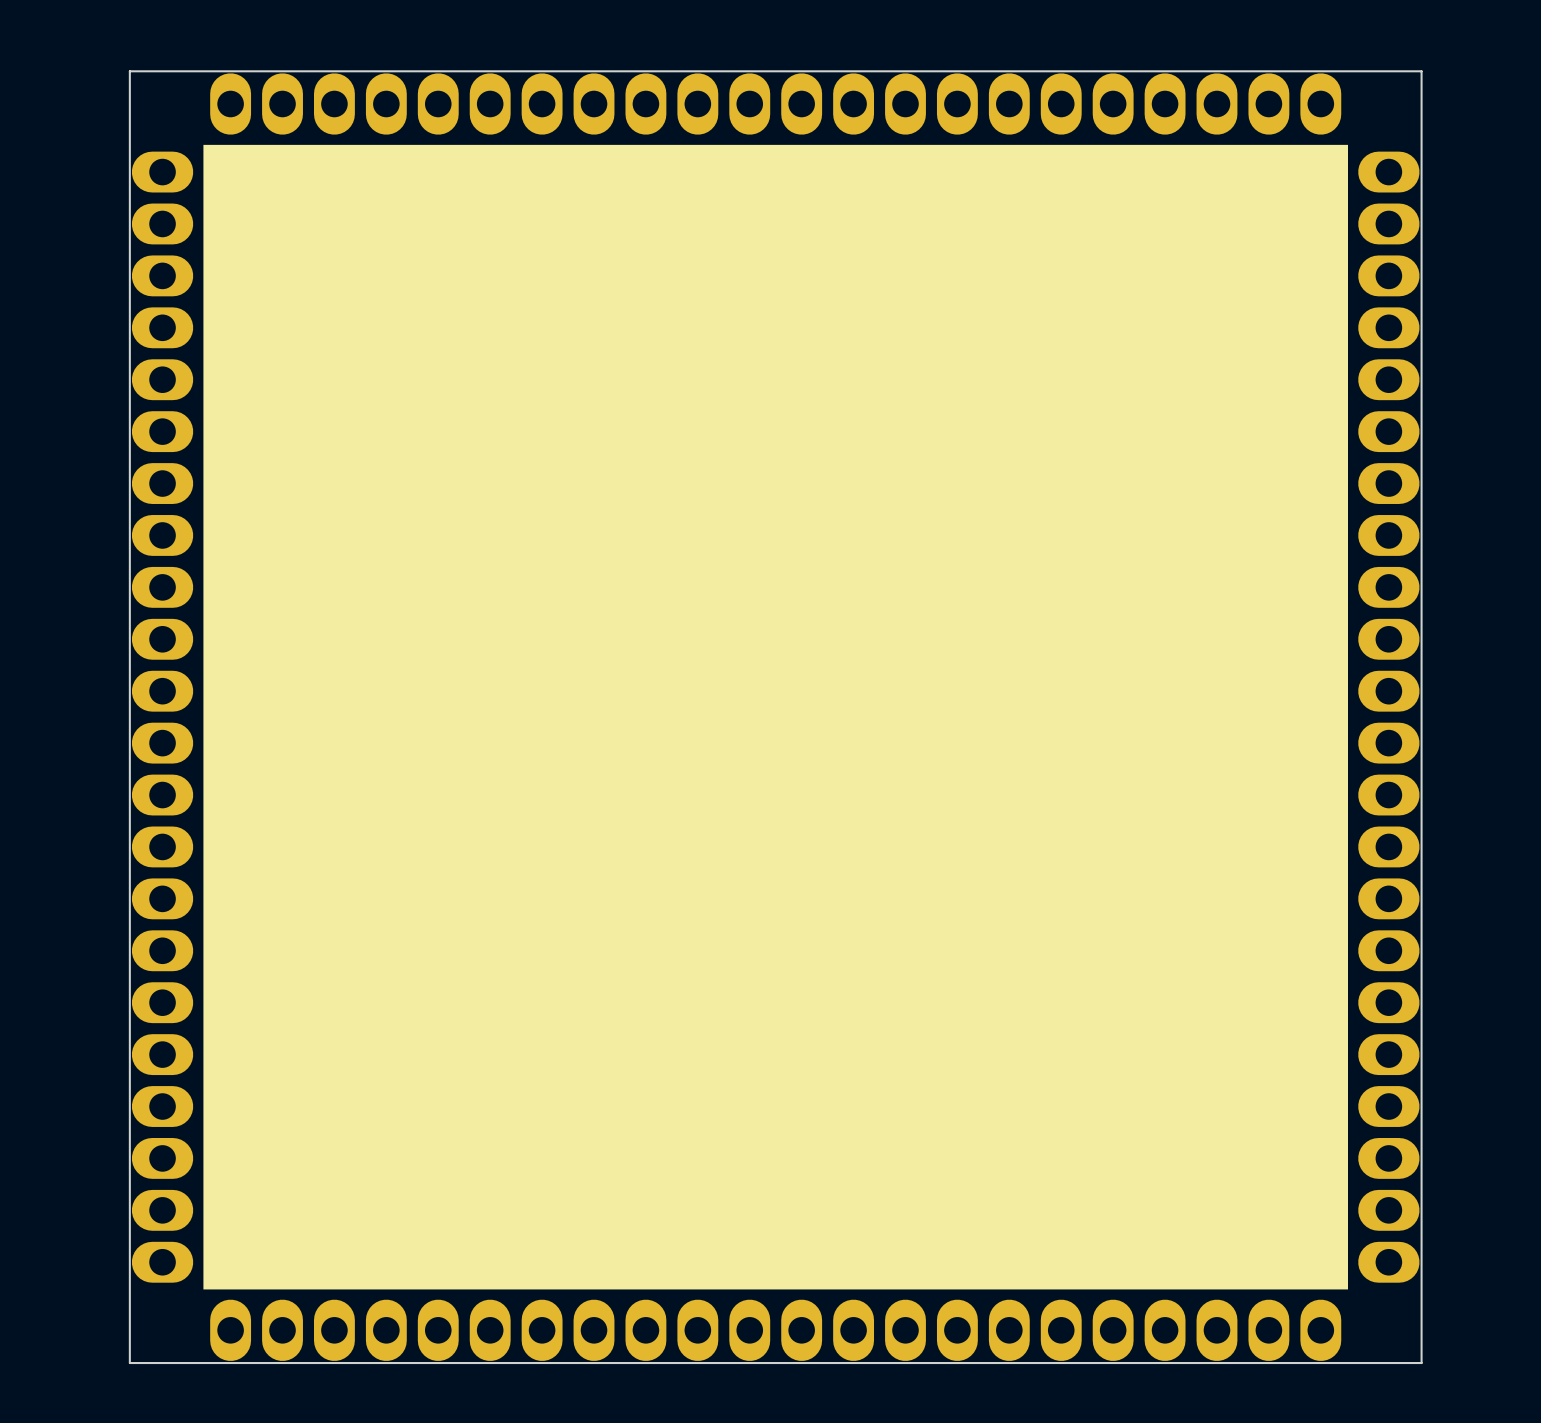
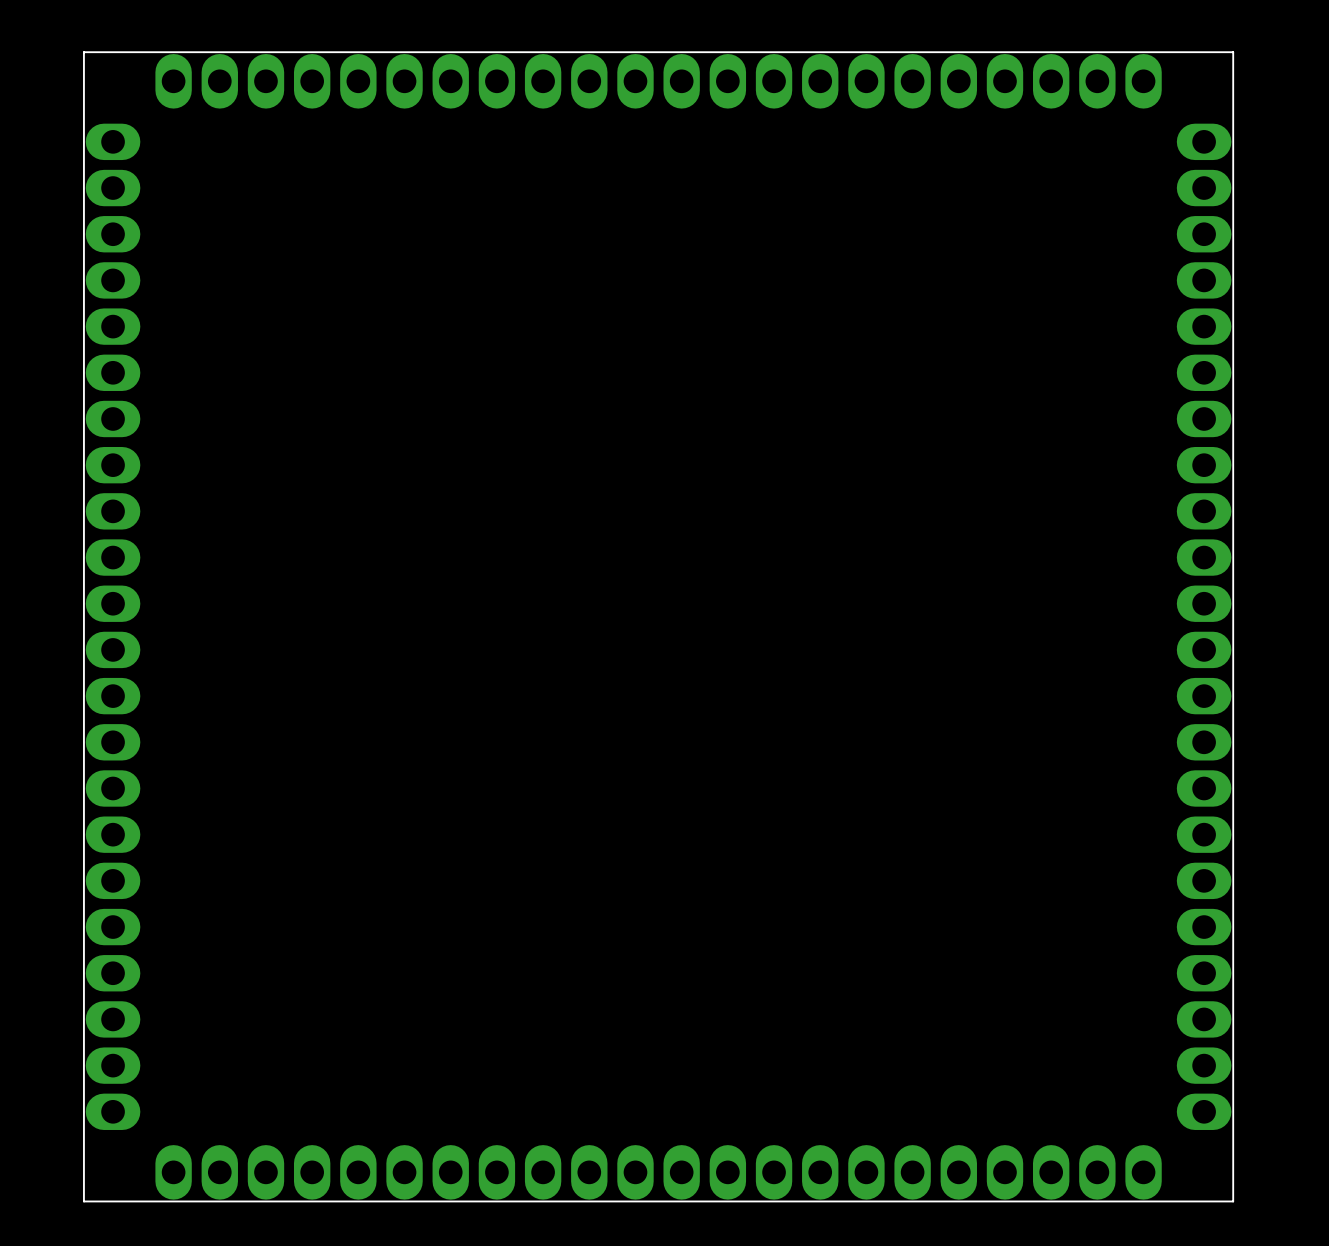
drawing: [203, 144, 1348, 1290] -> none

